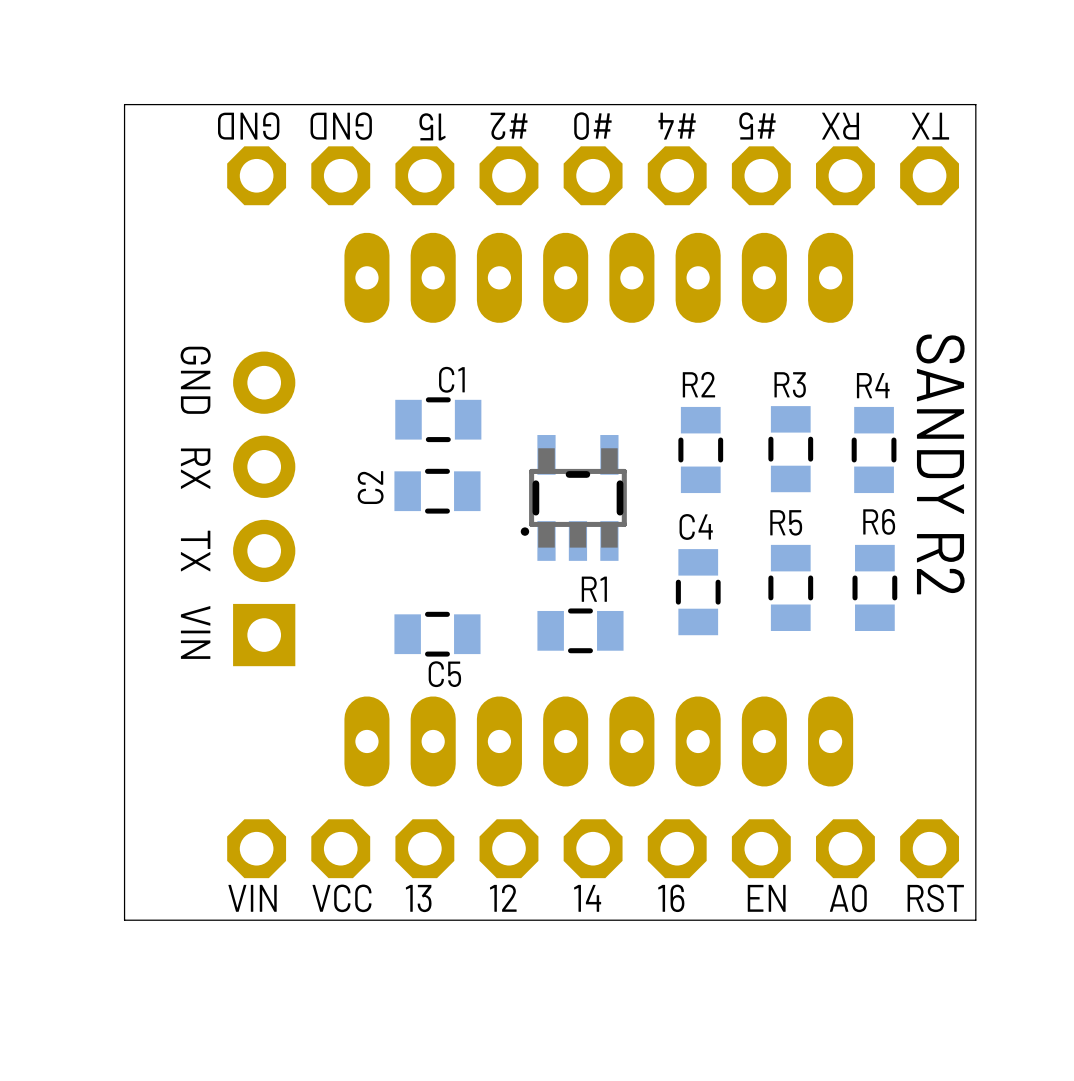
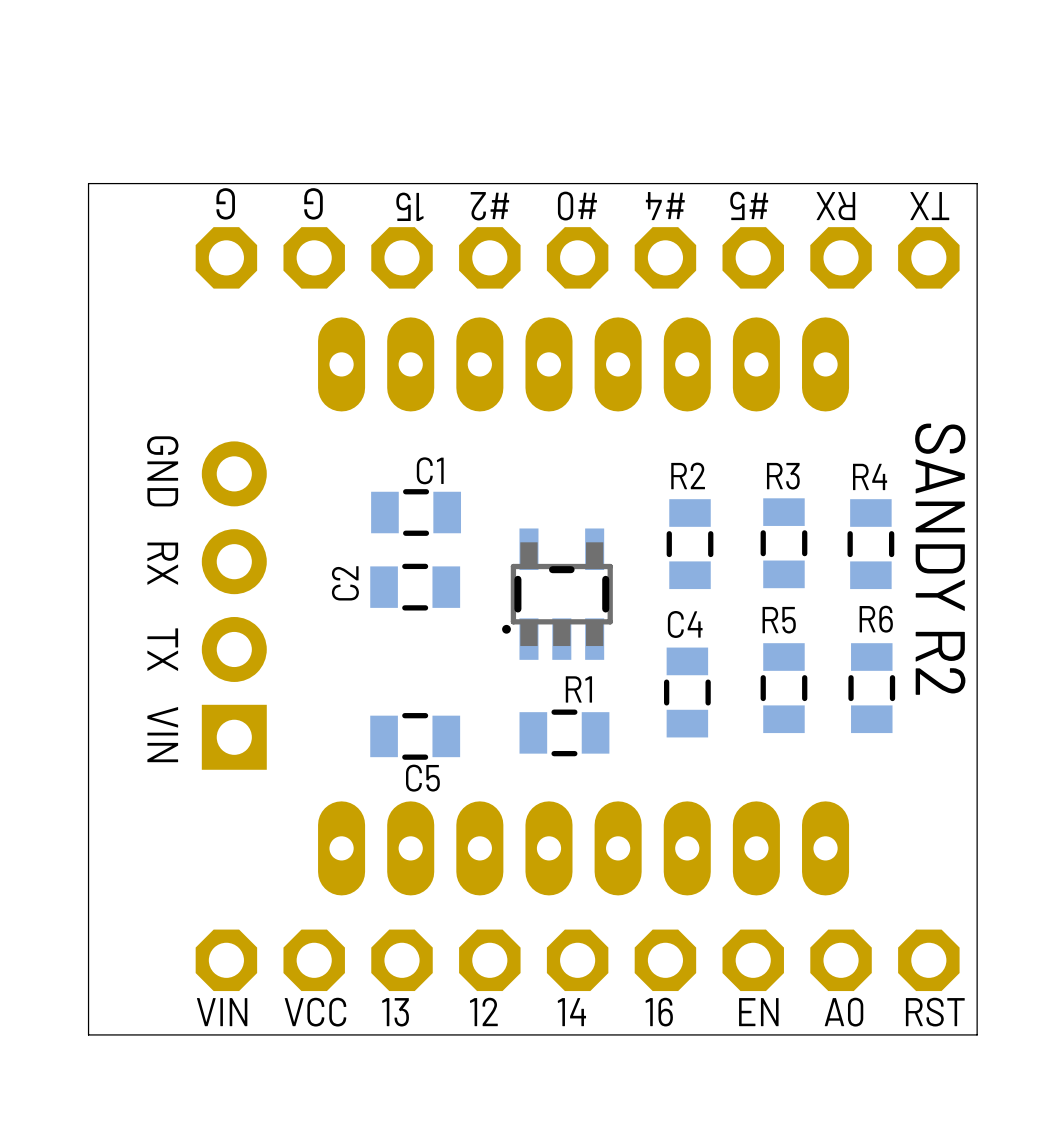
text: GND (248, 126) -> G (225, 203)
text: GND (341, 126) -> G (313, 203)

